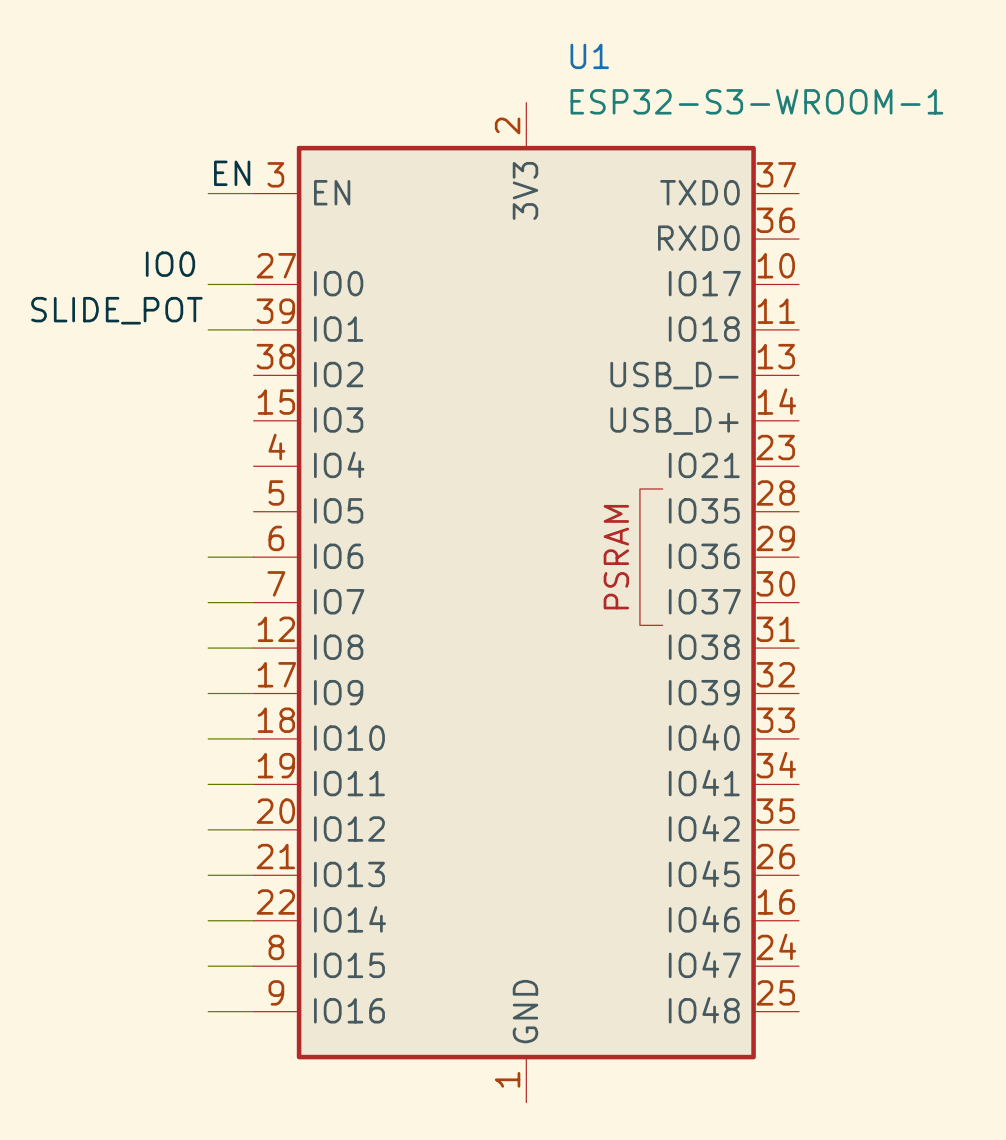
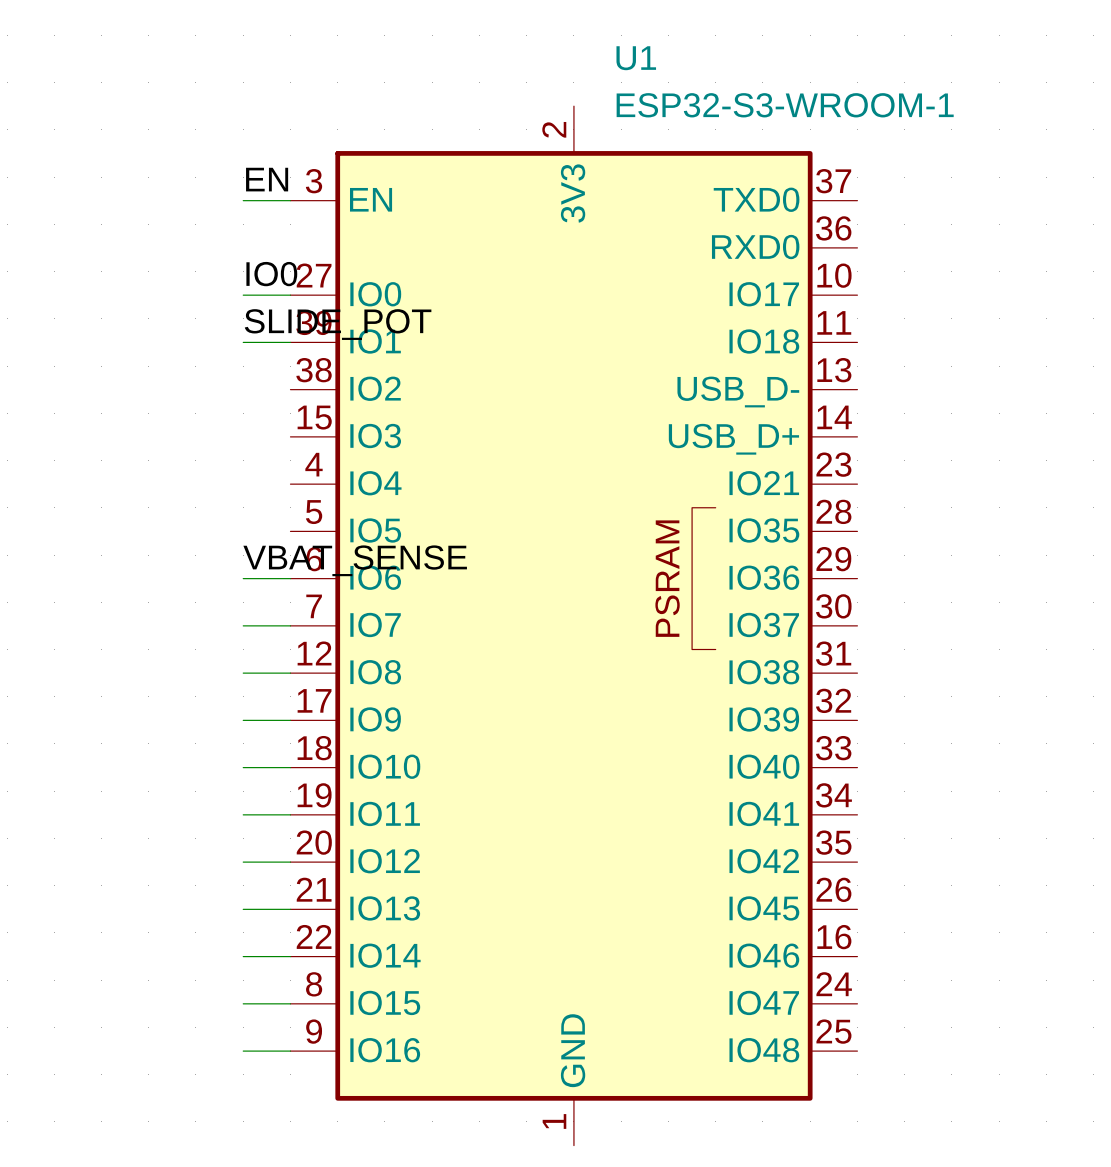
label position: IO0 (170, 264) -> IO0 (271, 274)
label position: SLIDE_POT (116, 310) -> SLIDE_POT (338, 324)
label: none -> VBAT_SENSE (355, 560)

